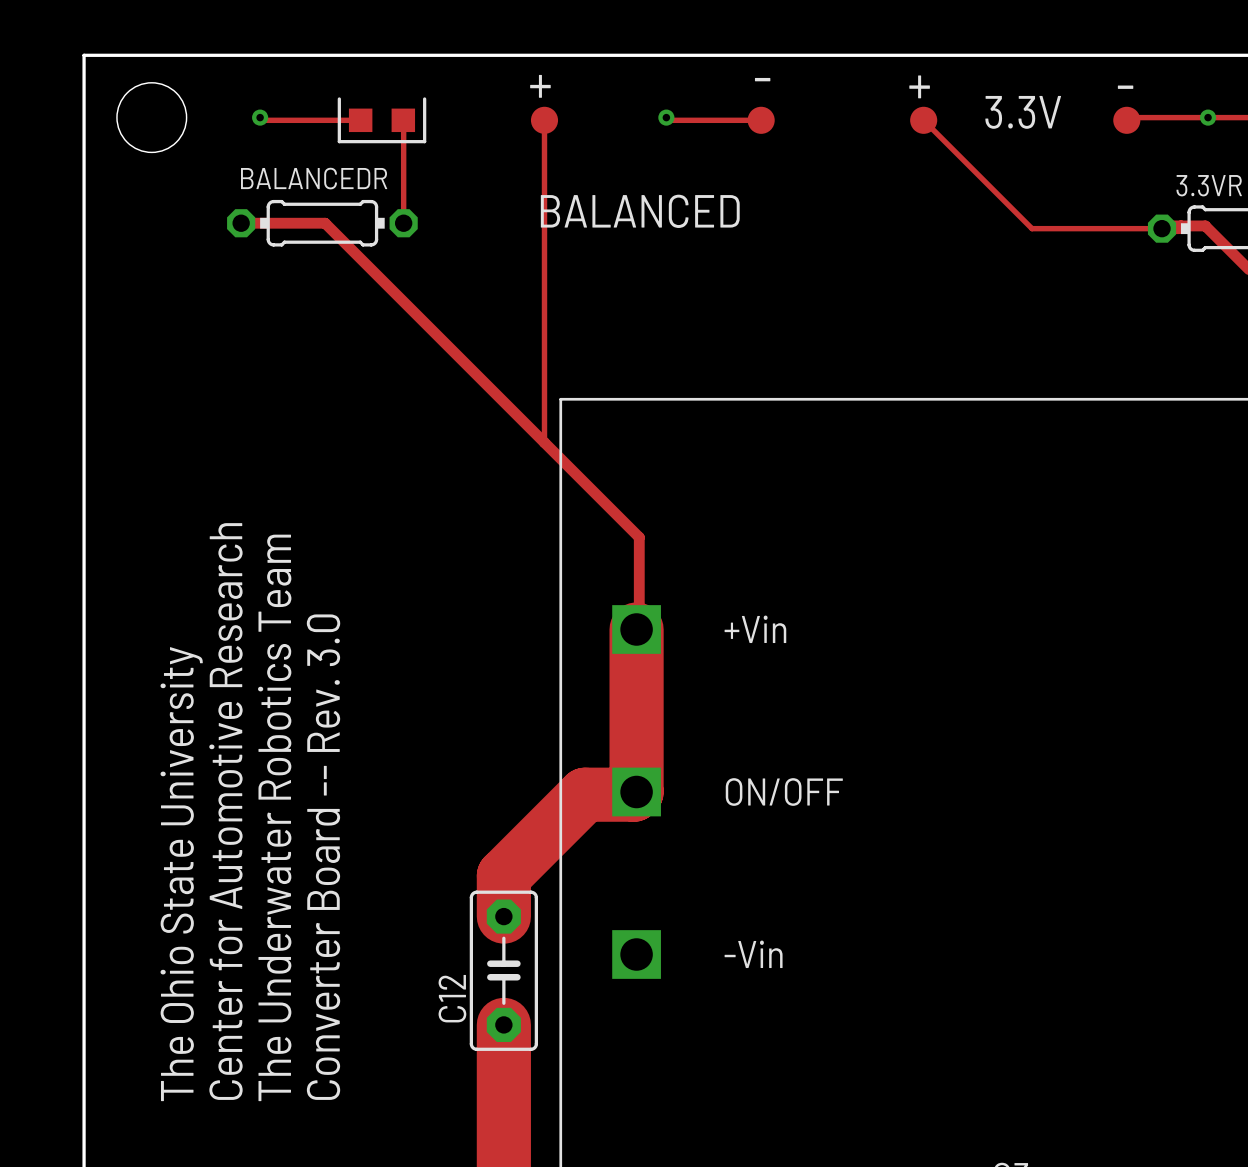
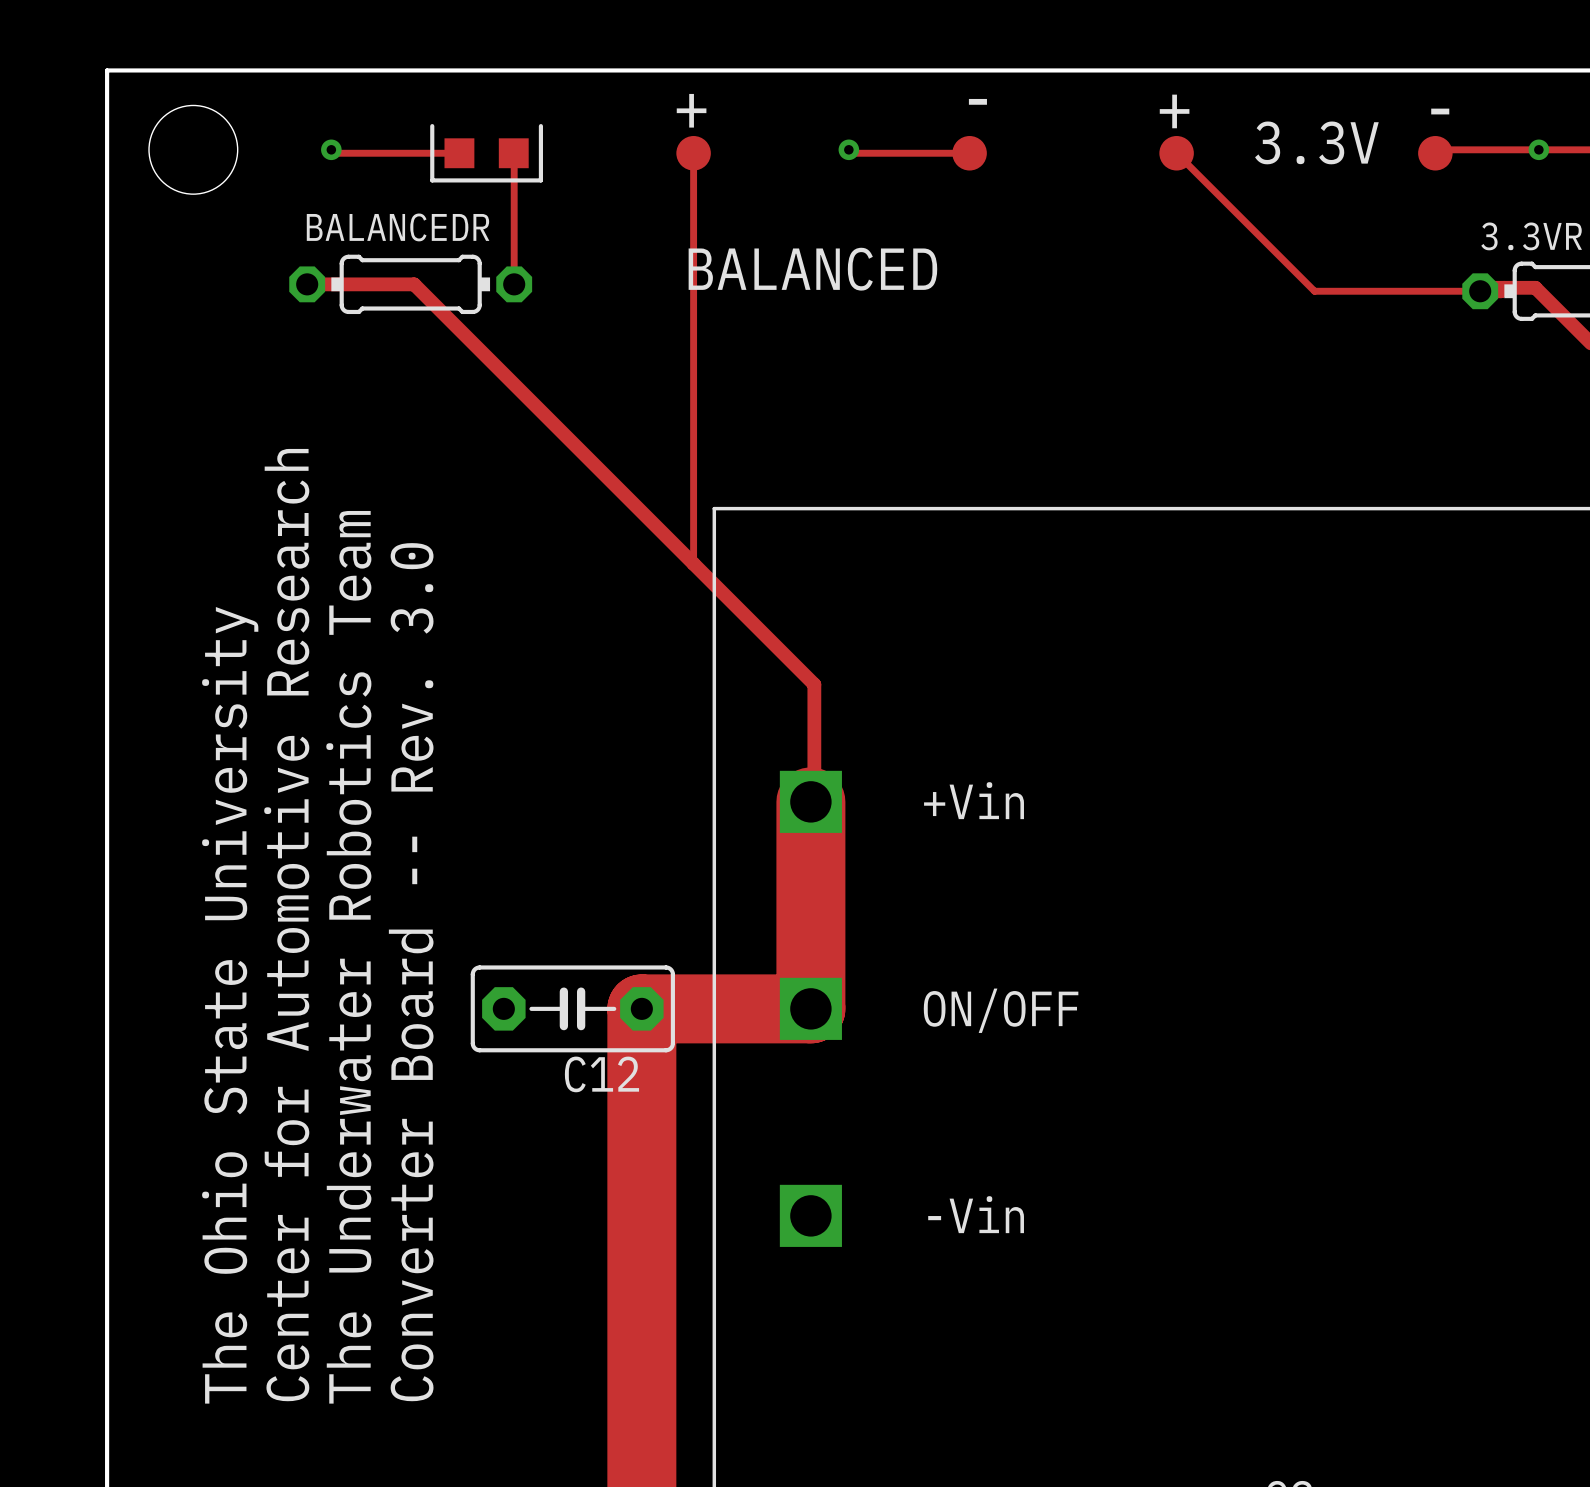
track: (636, 792) (633, 794) (585, 794) (503, 875) -> (810, 1008) (641, 1008) (641, 1115)
track: none -> (641, 1167) (641, 1305)
C12 rotation: 0° (503, 970) -> 90° counterclockwise (572, 1008)
C12 position: (503, 970) -> (572, 1008)

